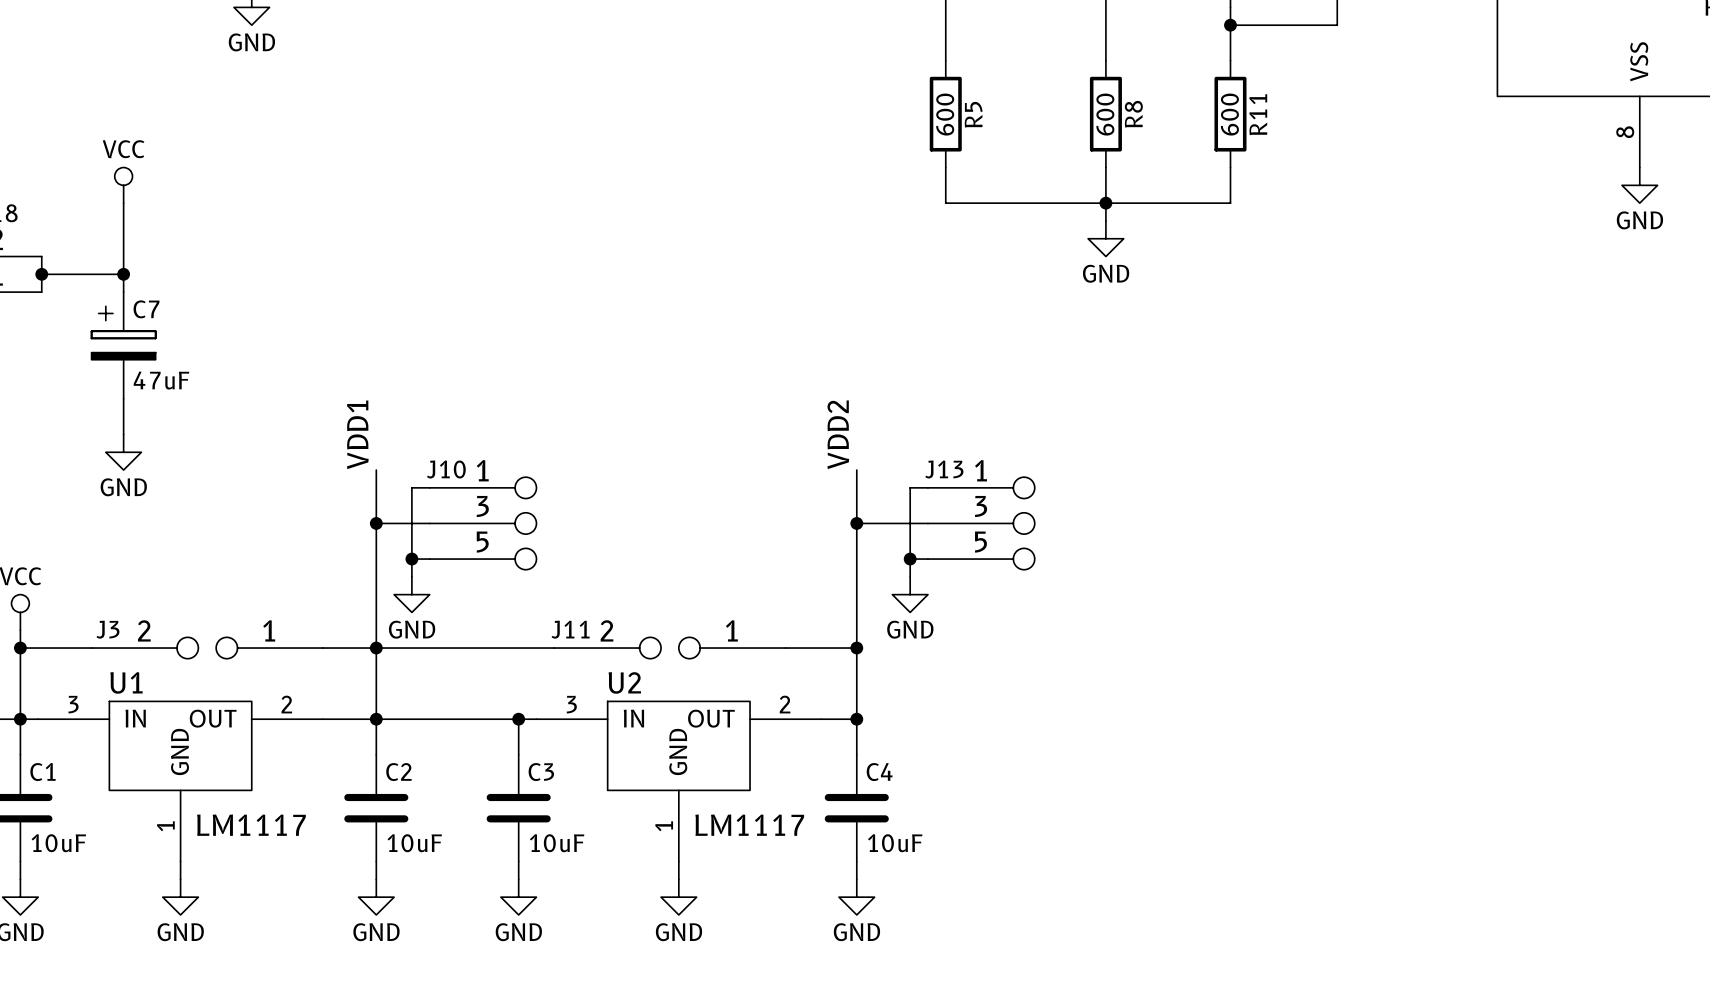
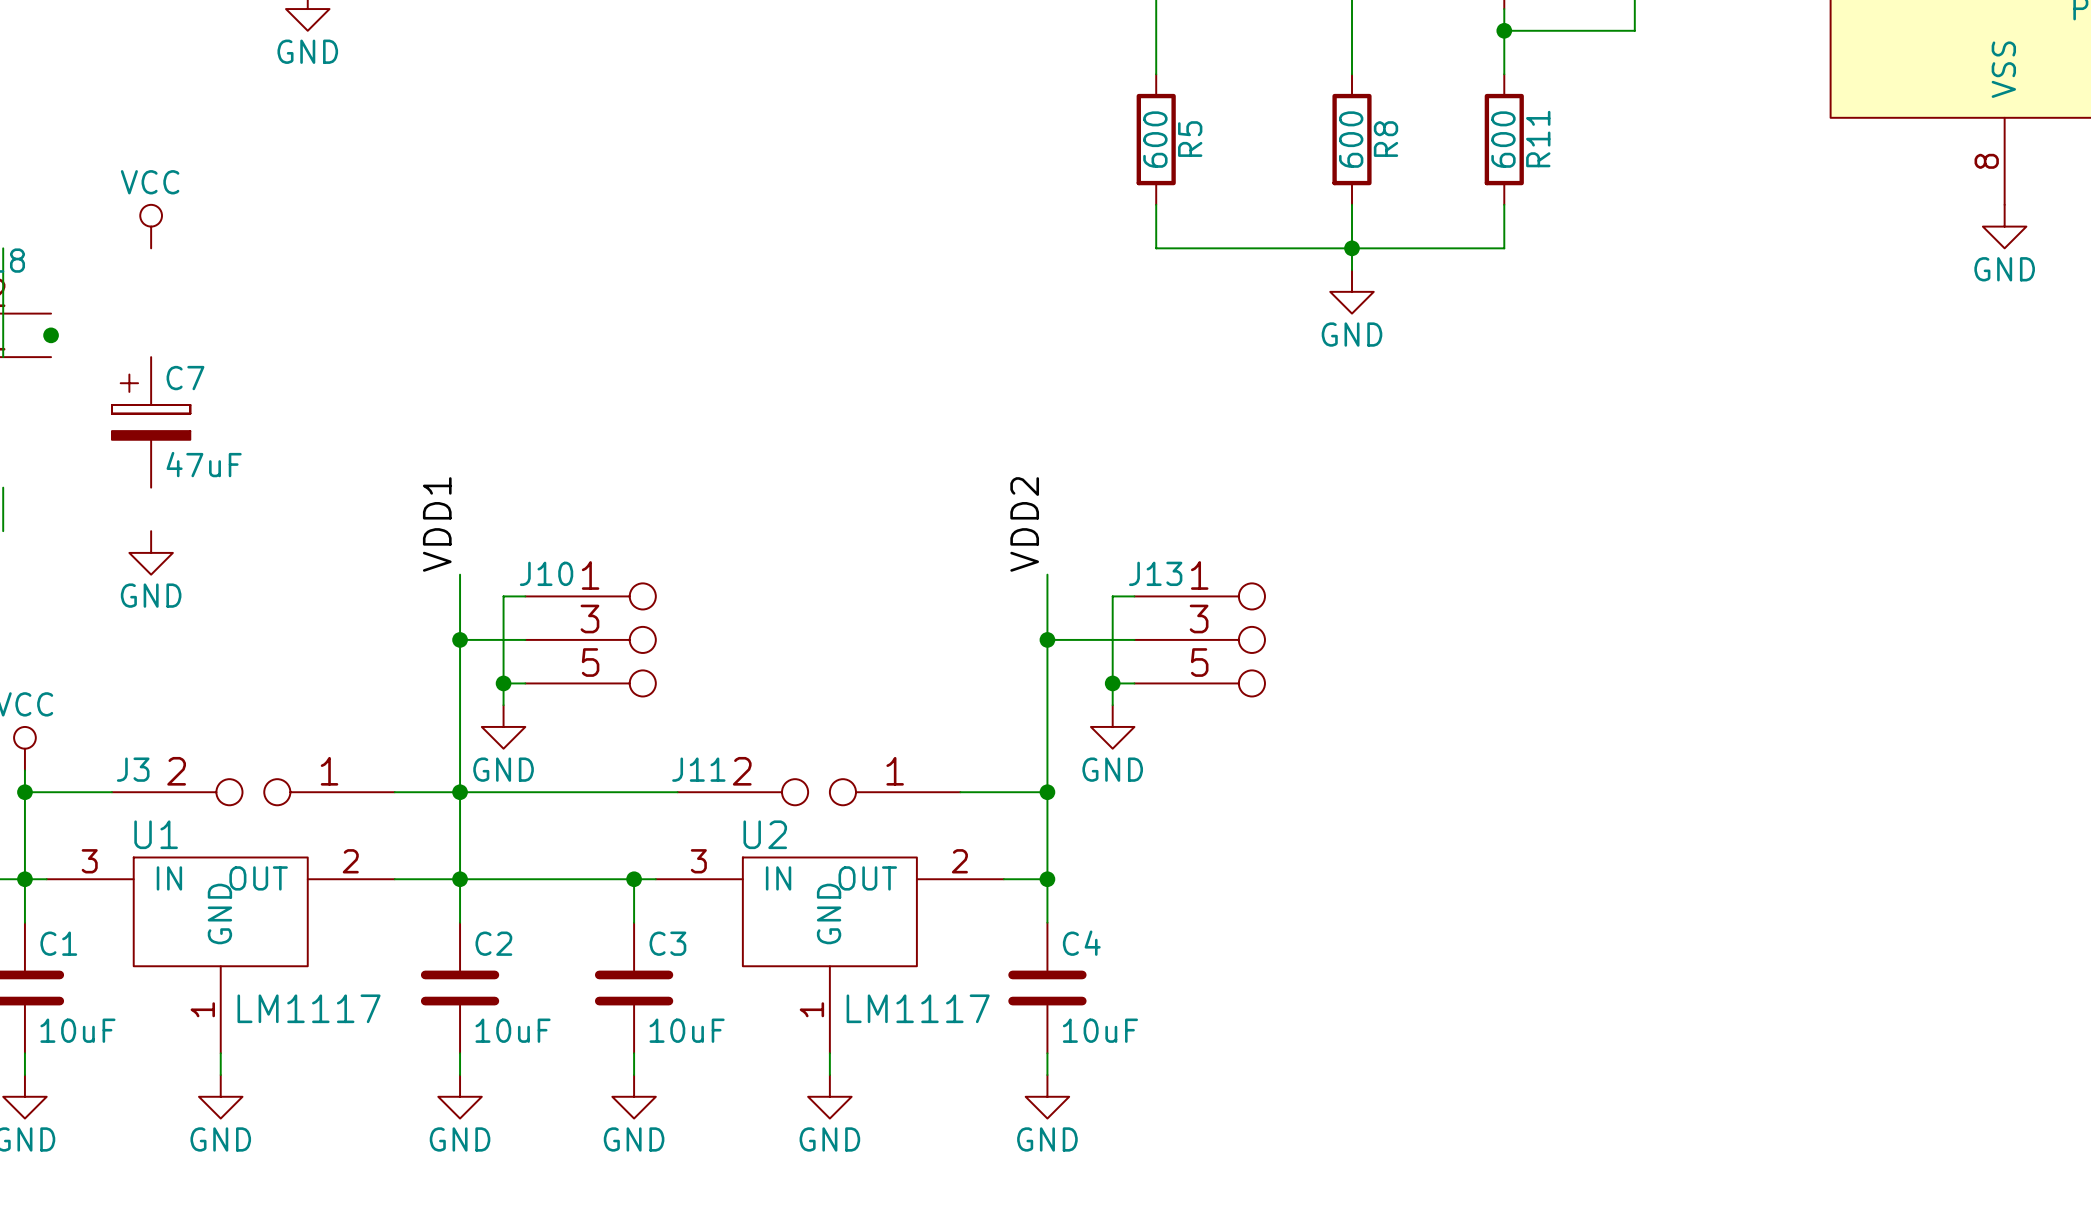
wire: (123, 203) (123, 292) -> (3, 248) (3, 357)
wire: (41, 256) (41, 292) -> none
wire: (41, 274) (123, 274) -> none
junction: (123, 274) -> none
wire: (123, 398) (123, 434) -> (3, 487) (3, 531)

